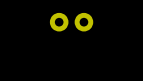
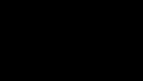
part: (71, 22) -> none

